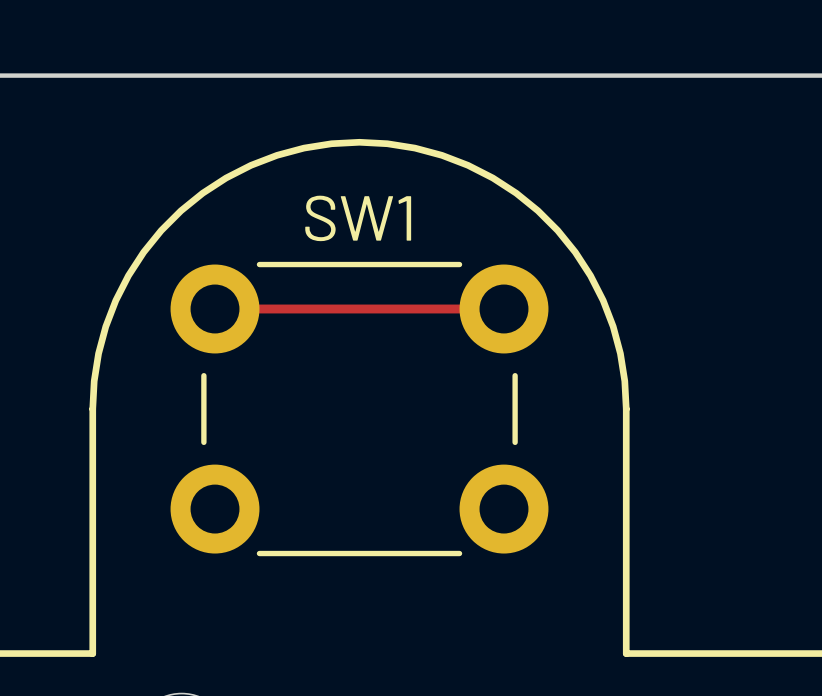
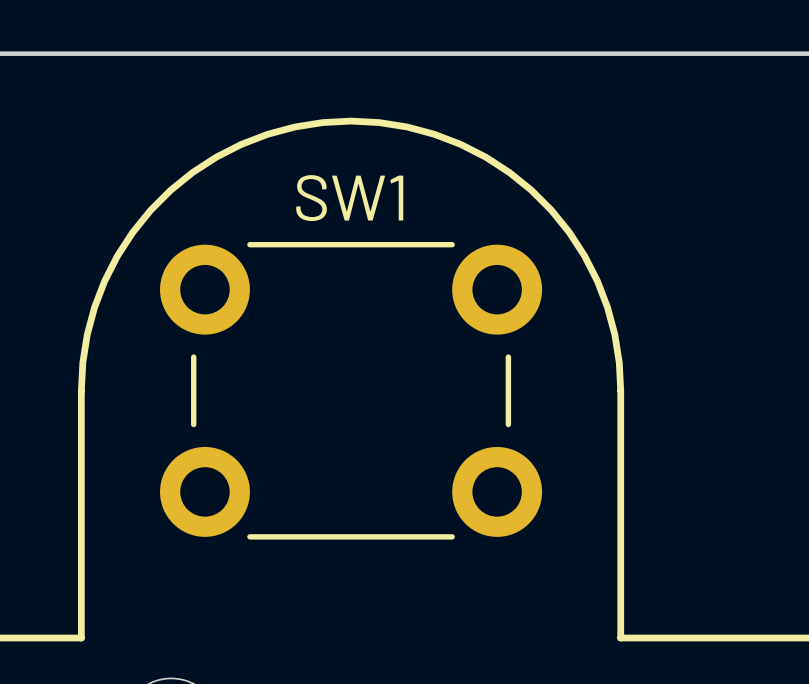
track: (215, 308) (503, 308) -> none

